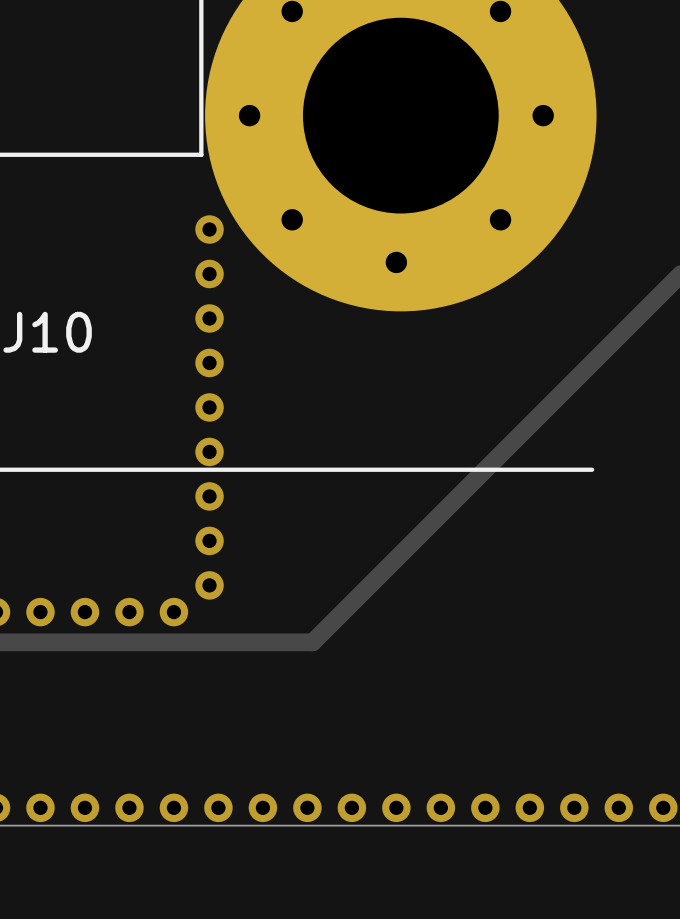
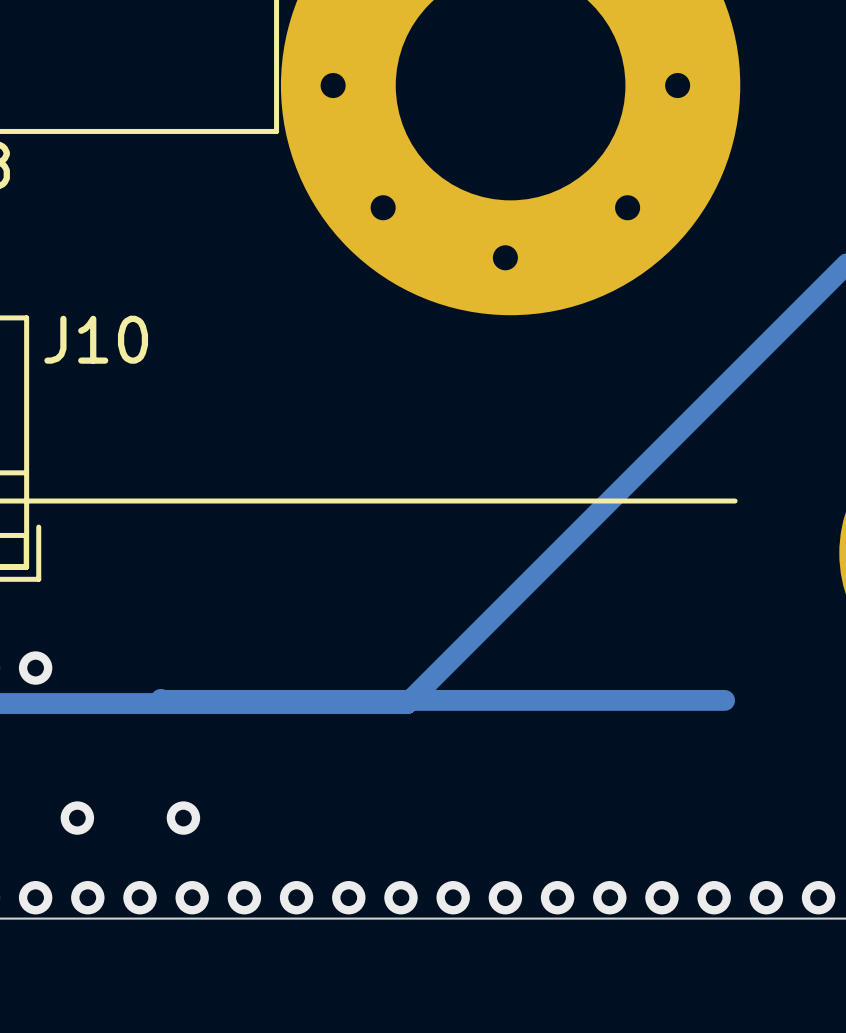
via: (209, 229) -> none
via: (209, 274) -> none
via: (209, 318) -> none
via: (209, 362) -> none
via: (209, 407) -> none
via: (209, 451) -> none
via: (209, 496) -> none
via: (209, 540) -> none
via: (209, 585) -> none
via: (40, 612) -> none
via: (84, 612) -> none
via: (129, 612) -> none
via: (173, 612) -> none
track: none -> (160, 699) (724, 700)
via: none -> (77, 818)
via: none -> (183, 818)

